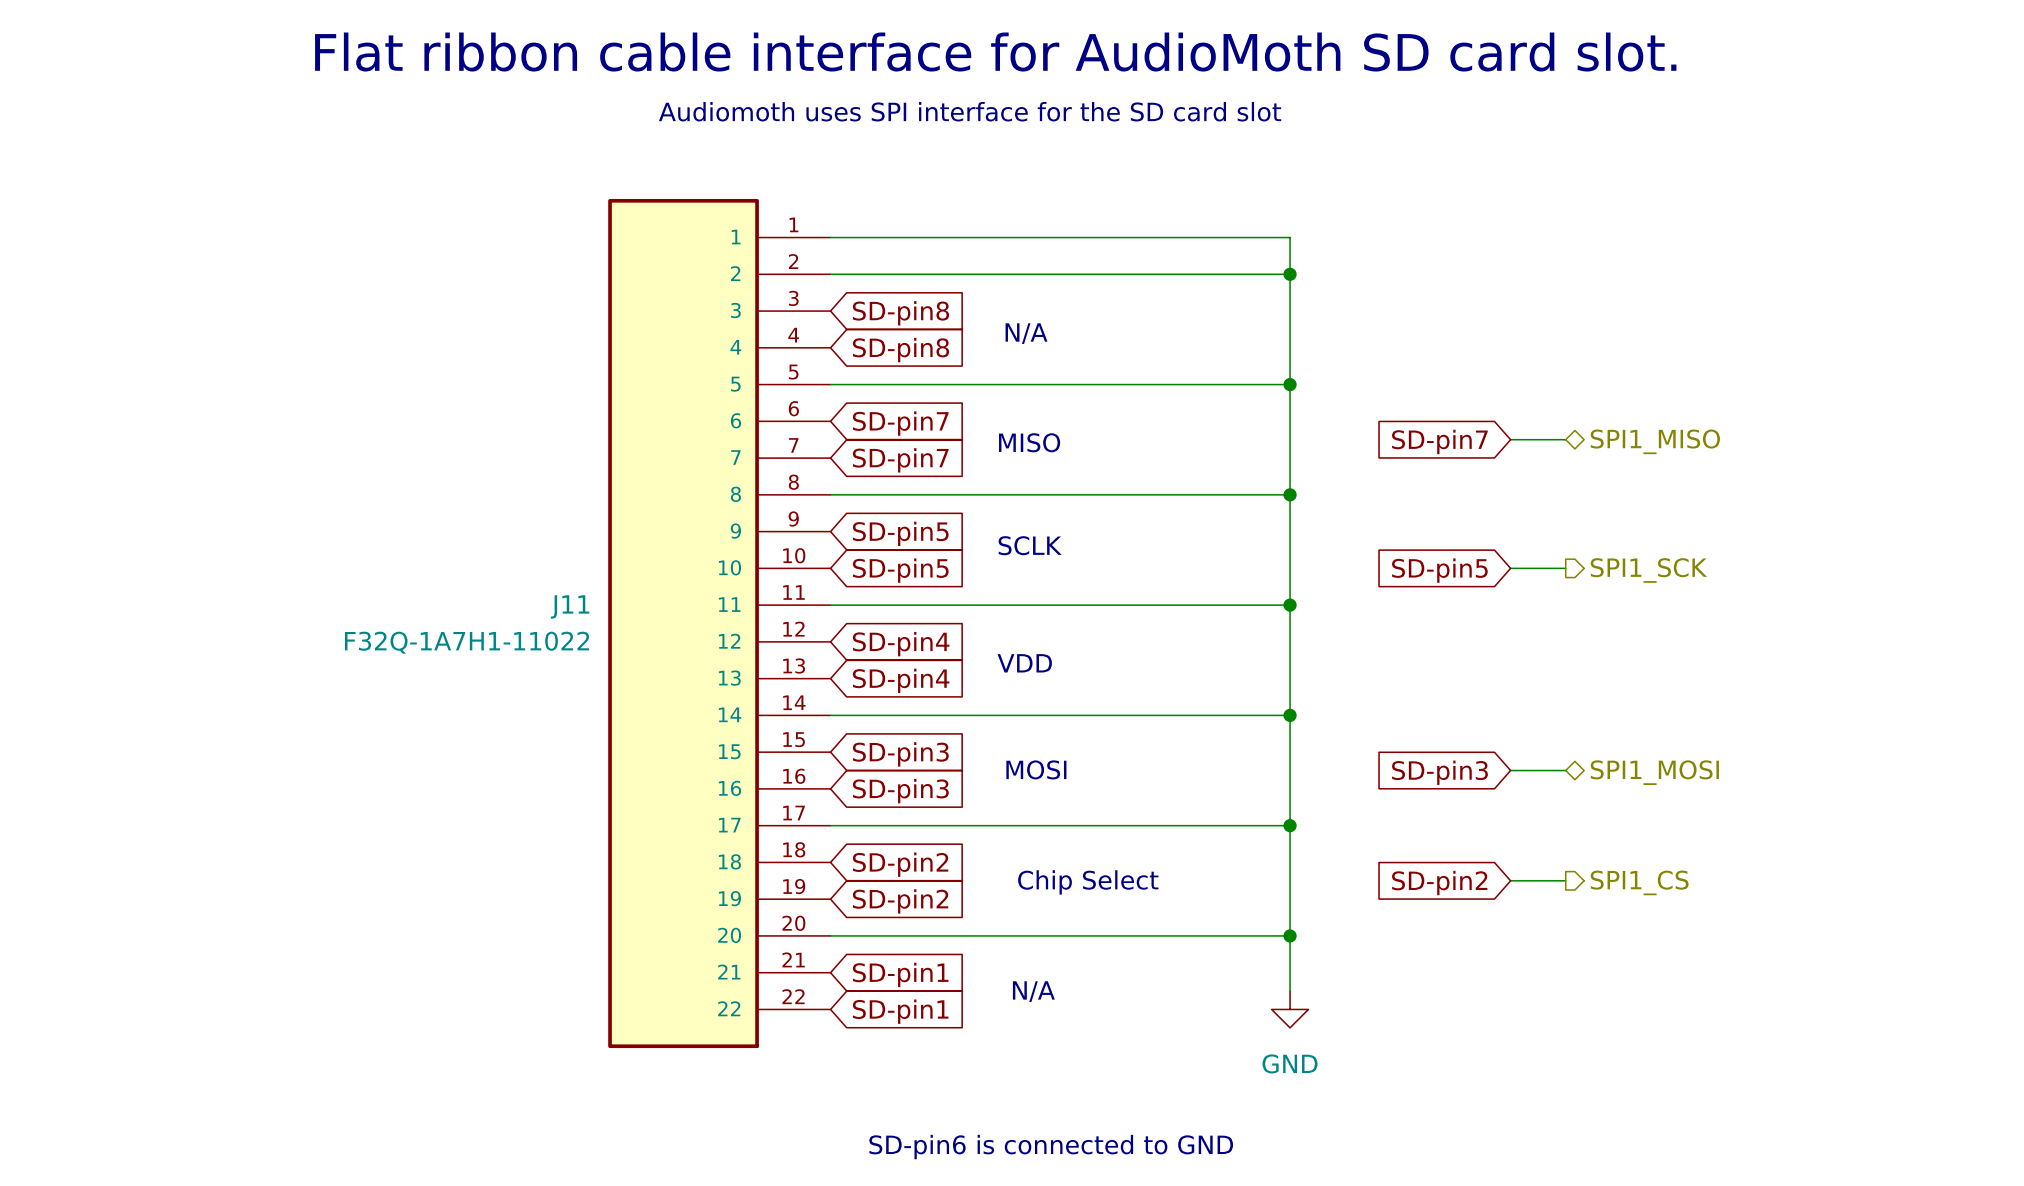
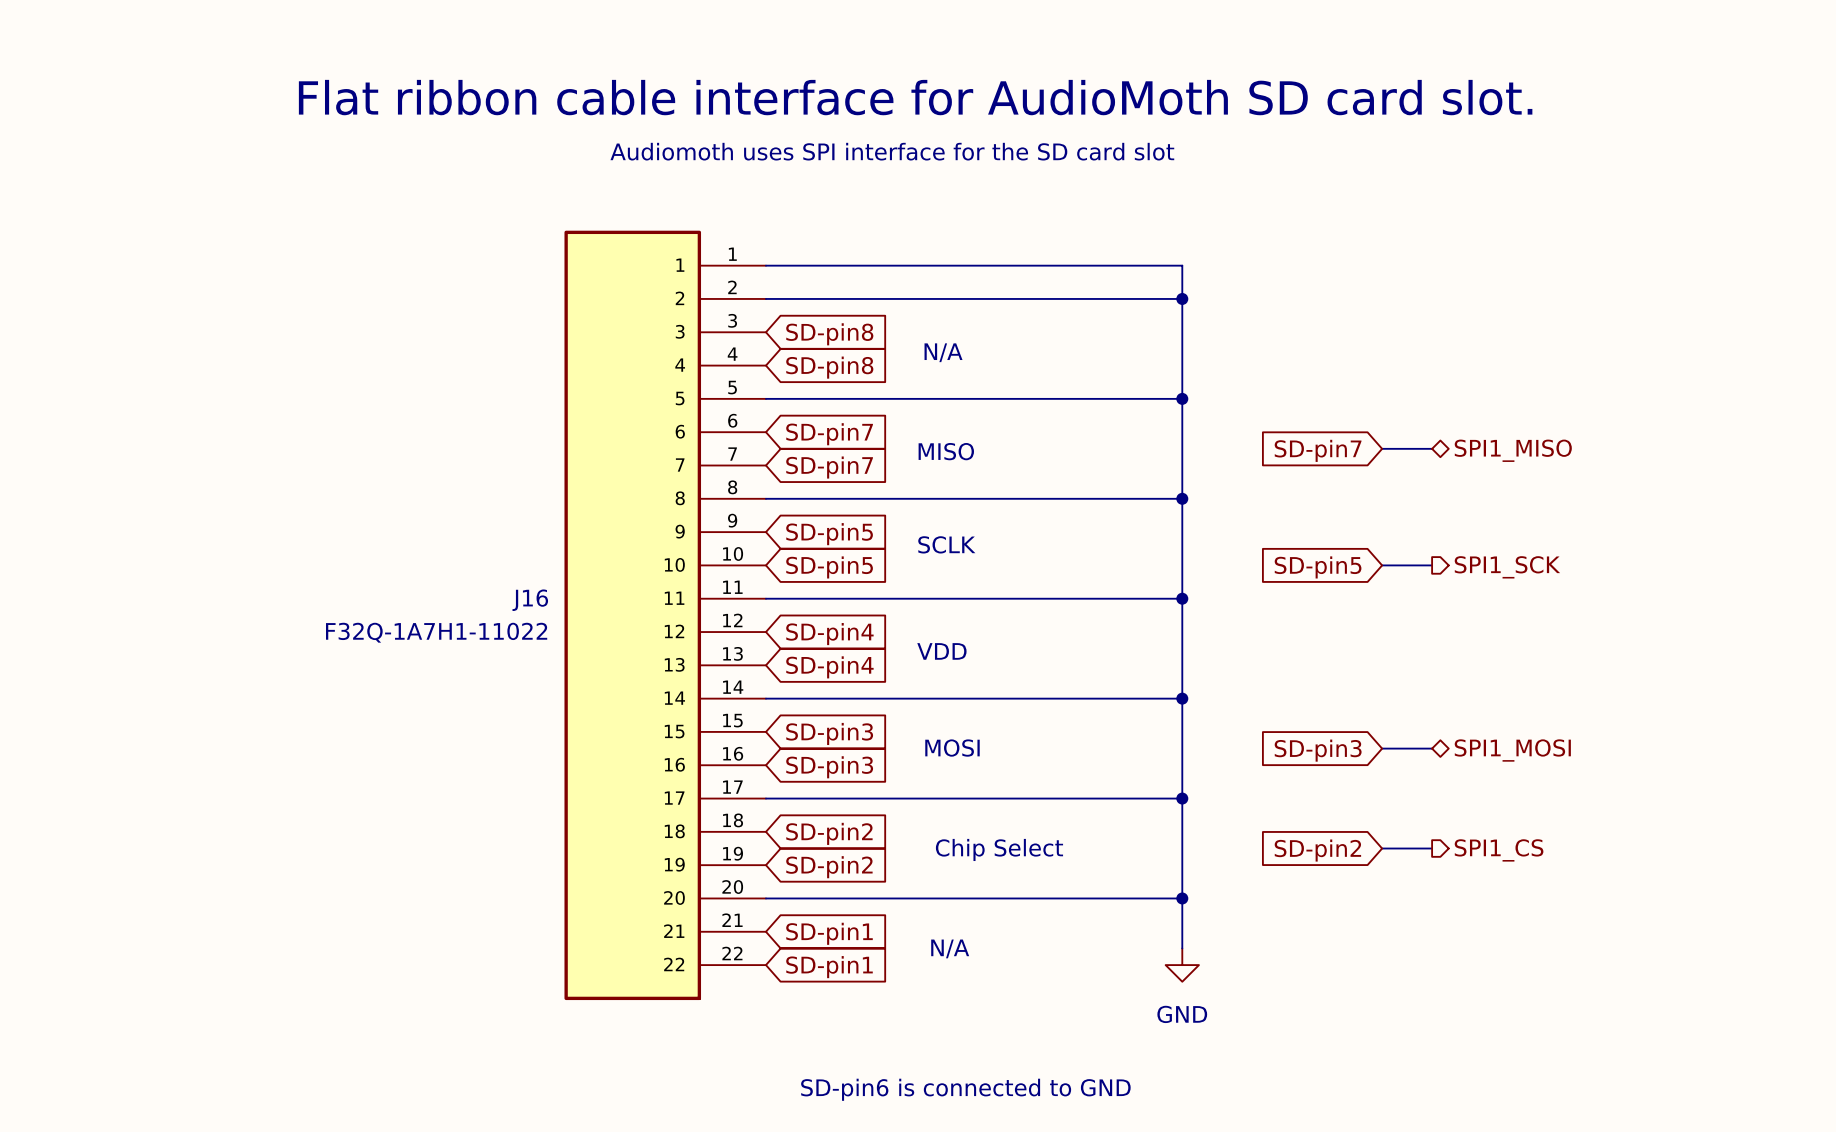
J11 name: J11 (570, 606) -> J16 (530, 600)

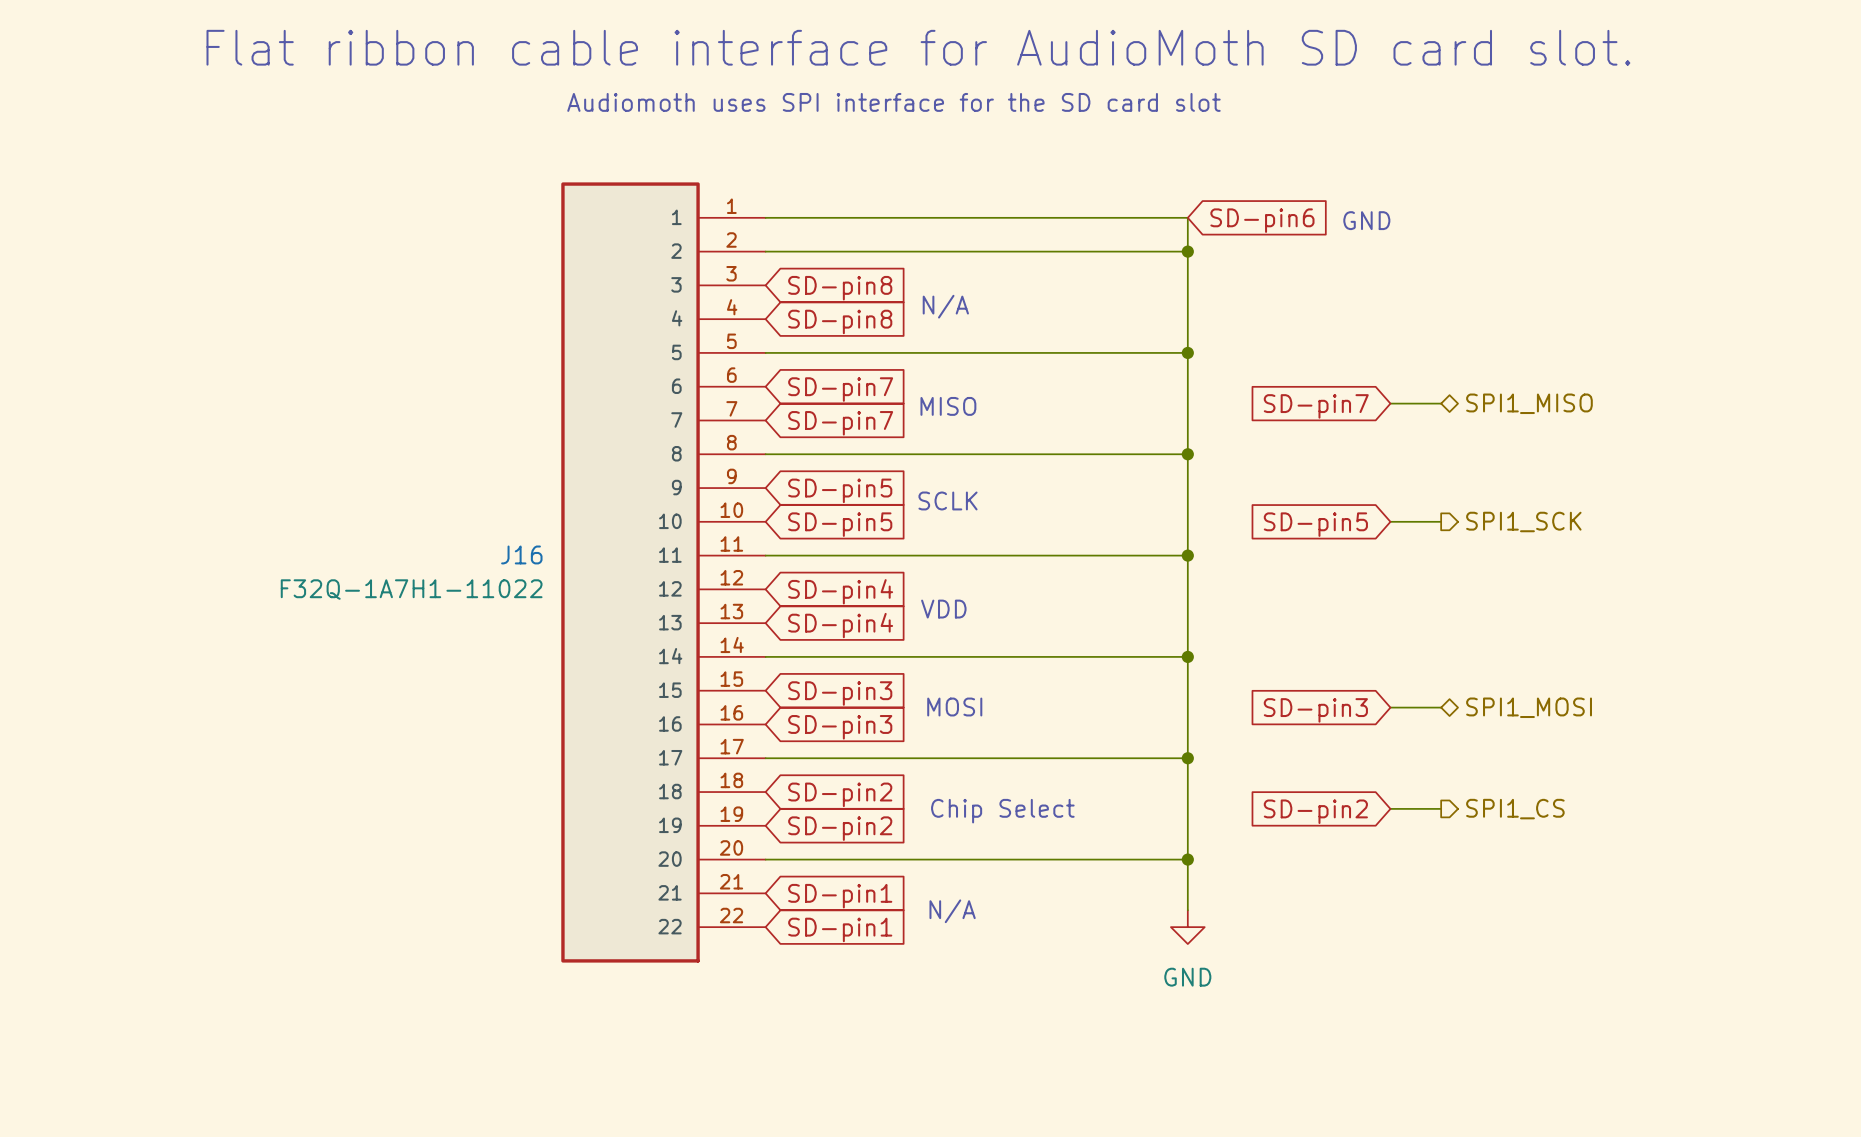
global label: none -> SD-pin6 (1262, 220)
text: none -> GND (1366, 220)
text: SD-pin6 is connected to GND (965, 1089) -> none

